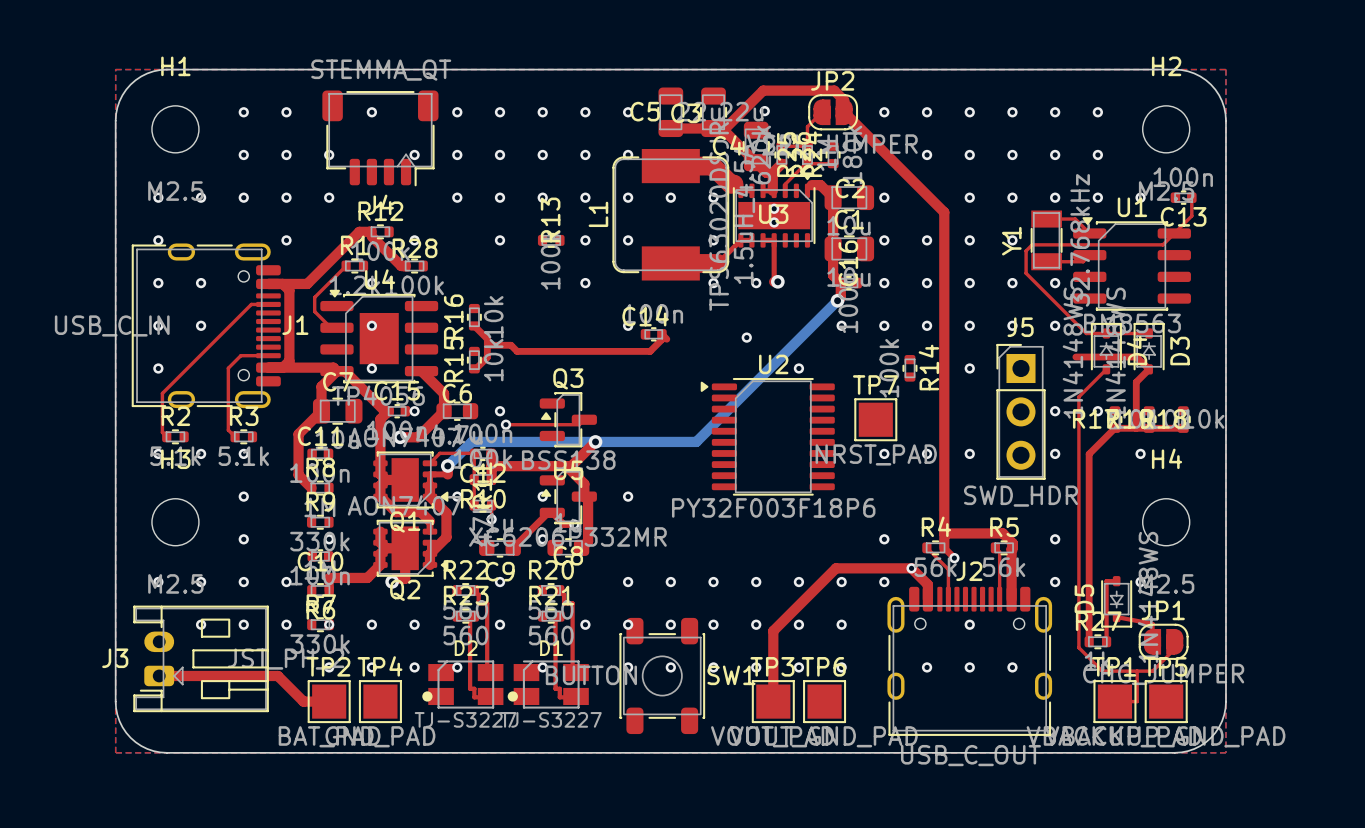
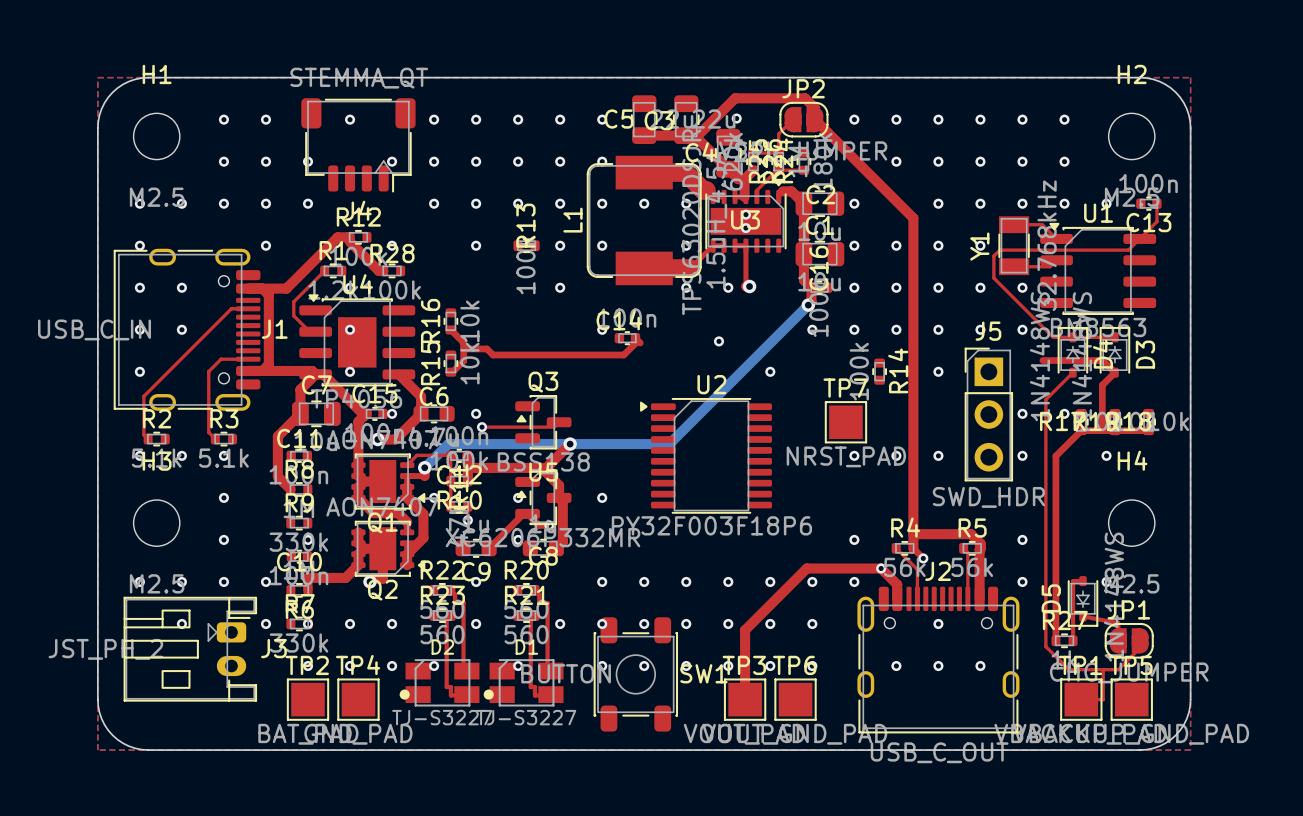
U2 position: (767, 436) -> (706, 455)
via: (243, 624) -> none
J3 rotation: 0° (201, 658) -> 180° (190, 649)
top track: (159, 675) (277, 675) (303, 701) (329, 701) -> none

